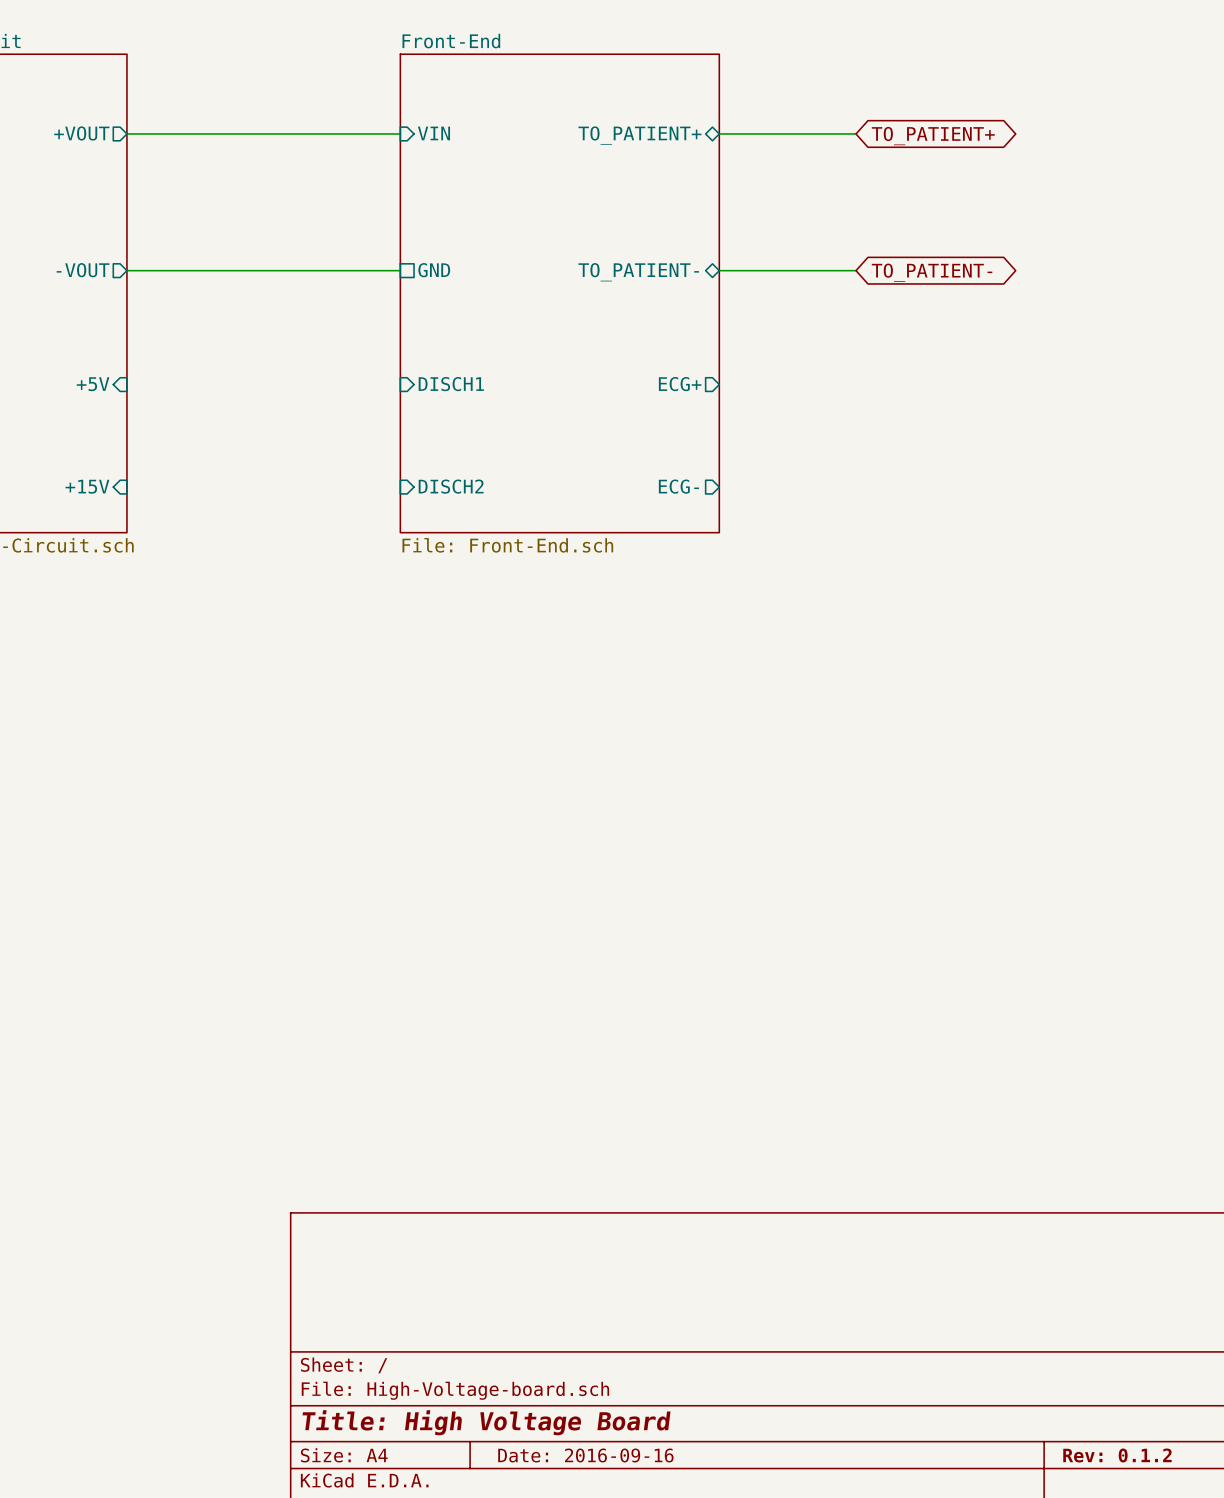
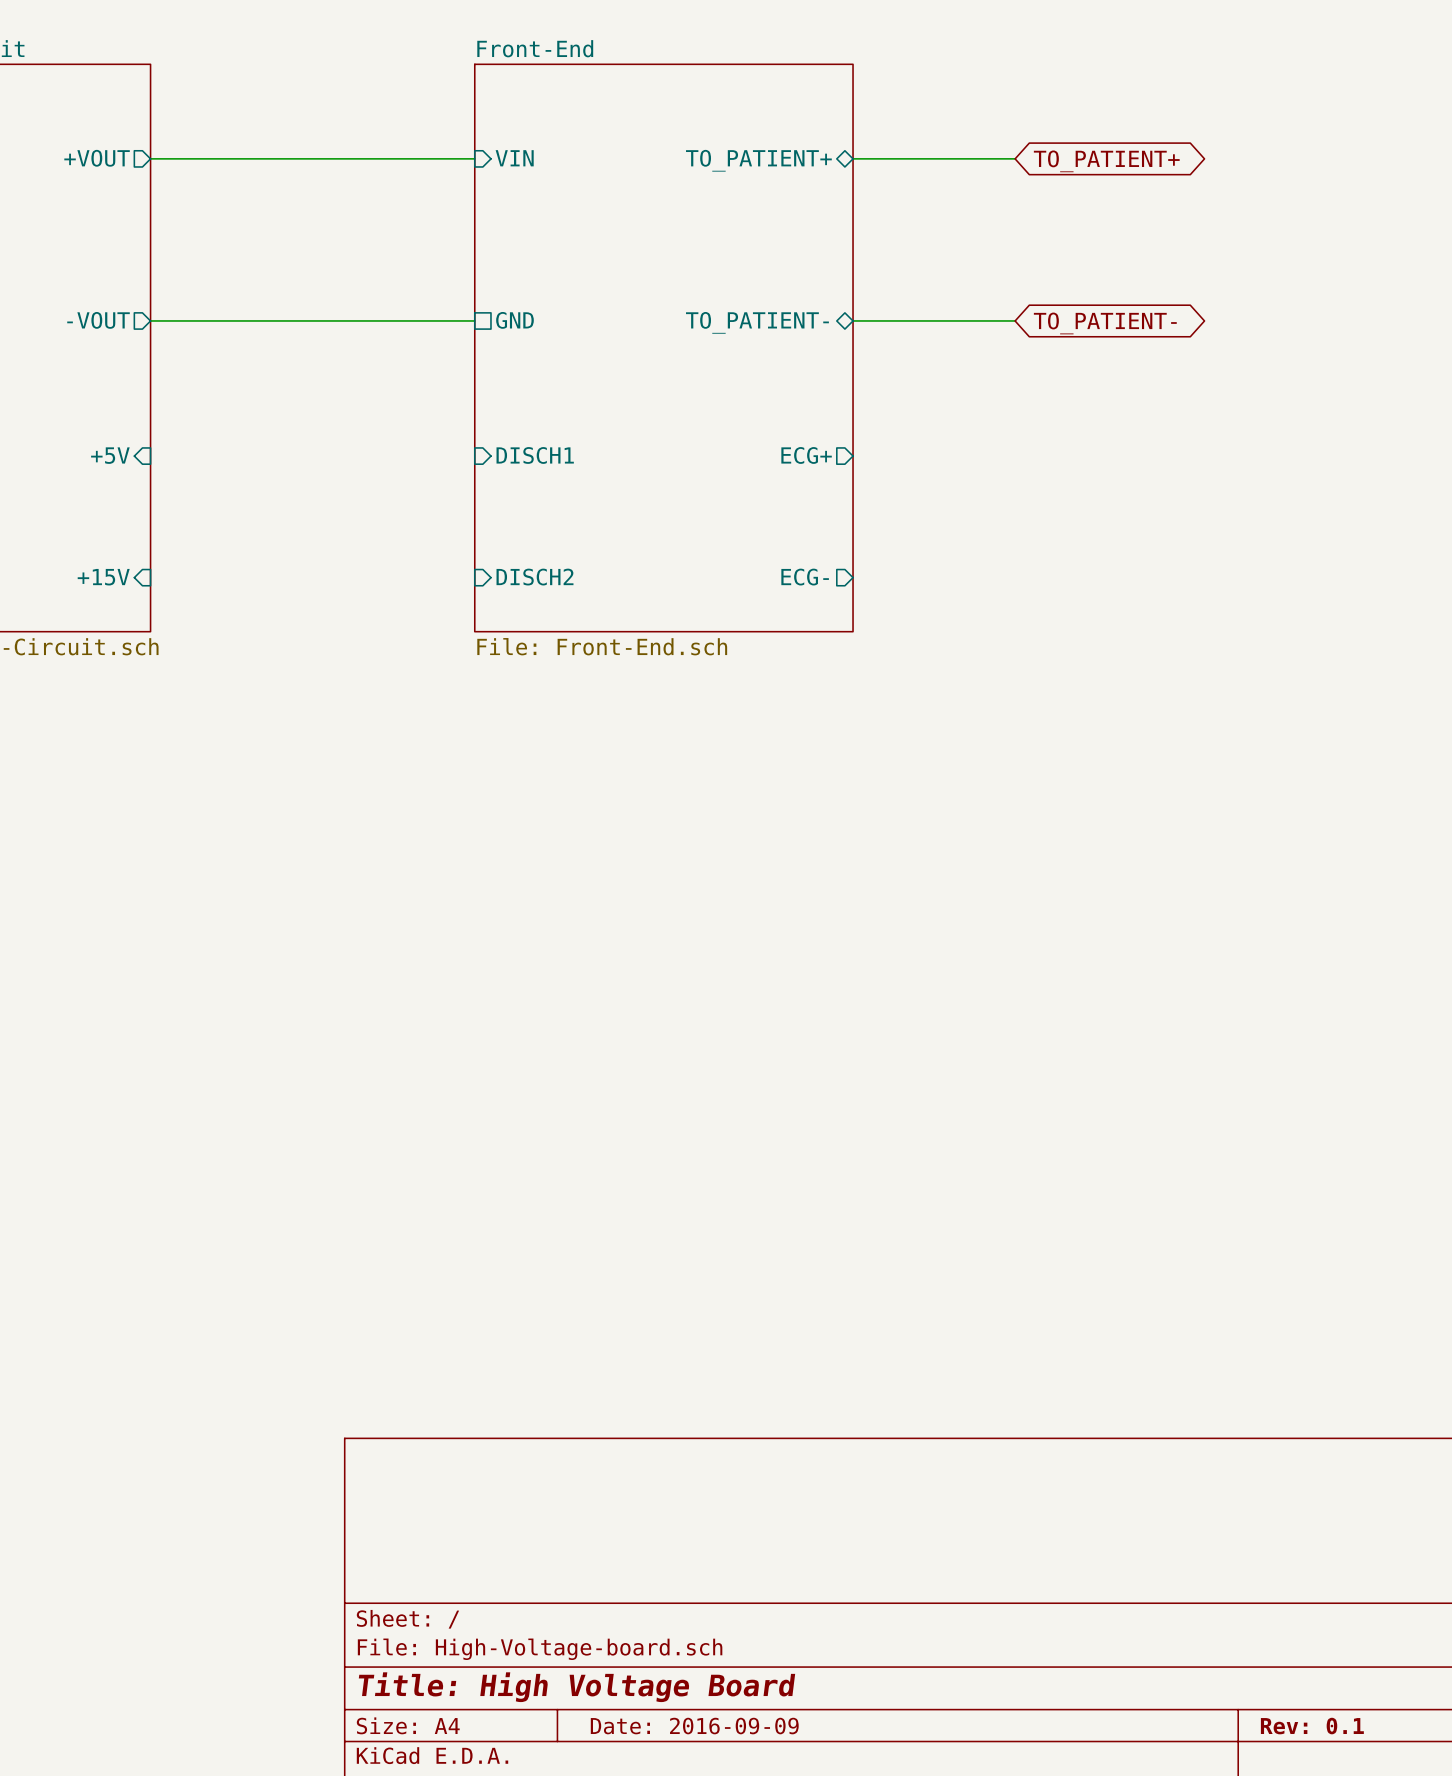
title block: Date: 2016-09-16 (585, 1455) -> Date: 2016-09-09 (694, 1726)
title block: Rev: 0.1.2 (1117, 1455) -> Rev: 0.1 (1312, 1726)

